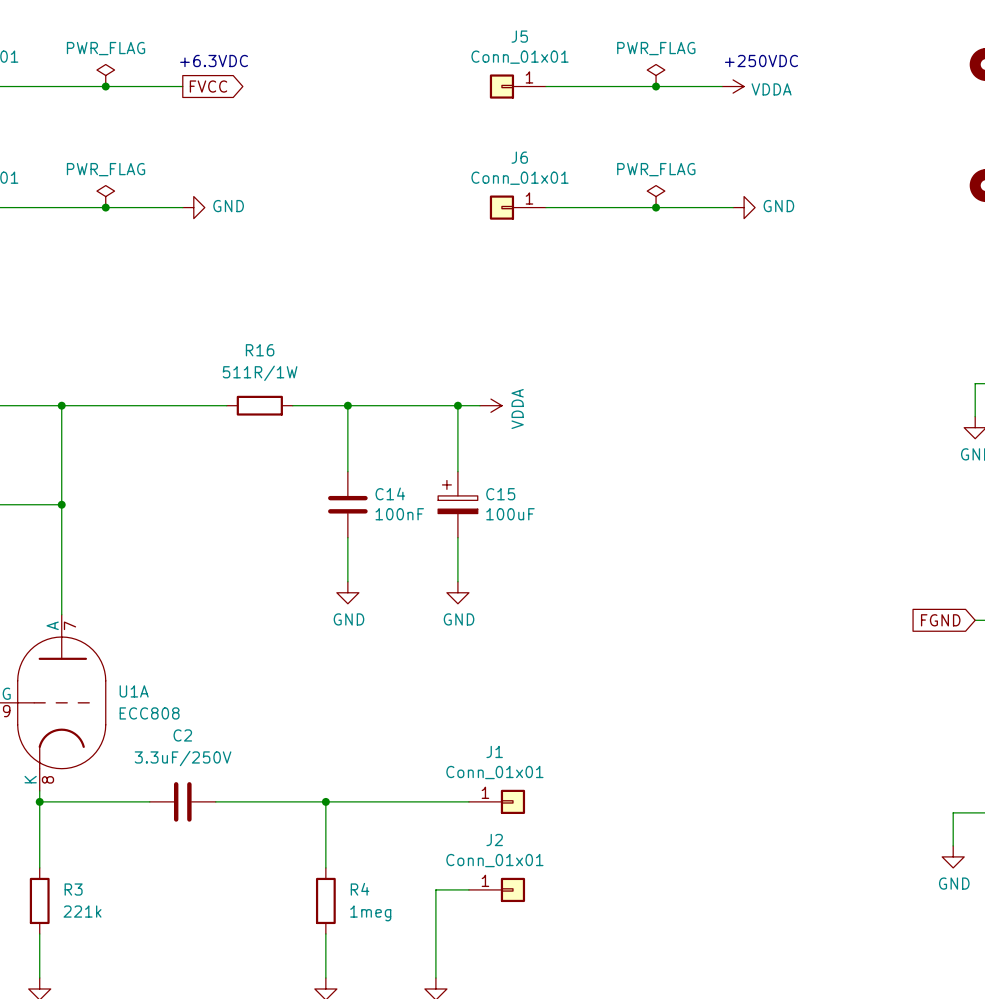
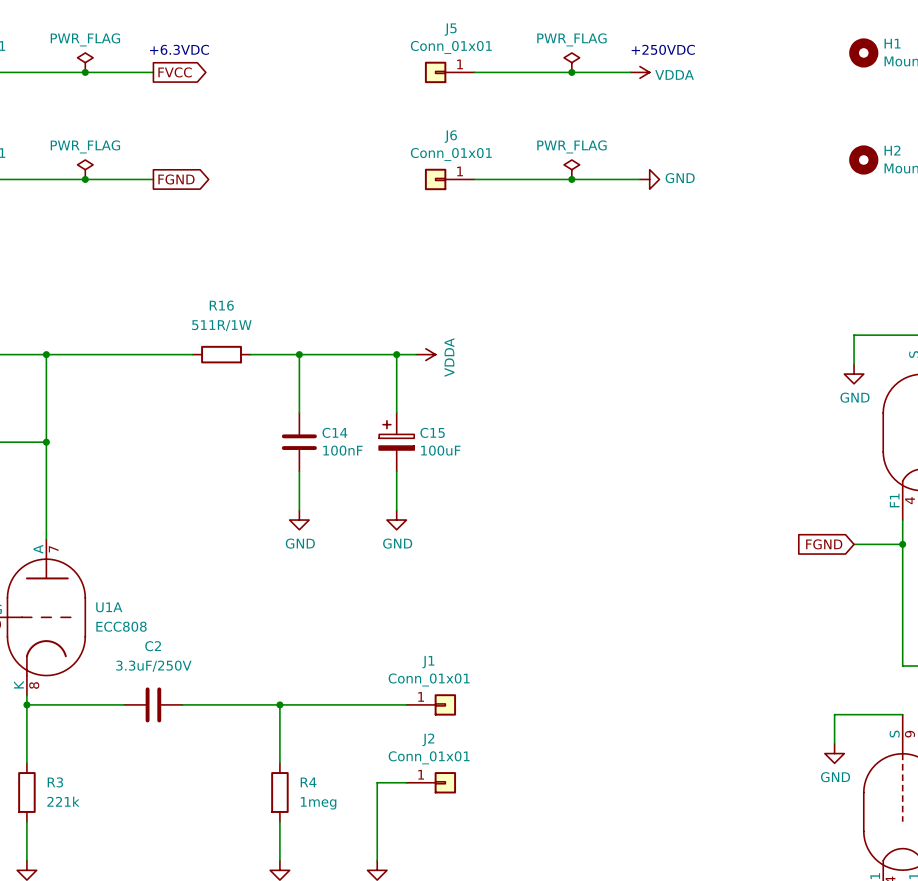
power symbol: GND (193, 207) -> none
global label: none -> FGND (176, 179)

